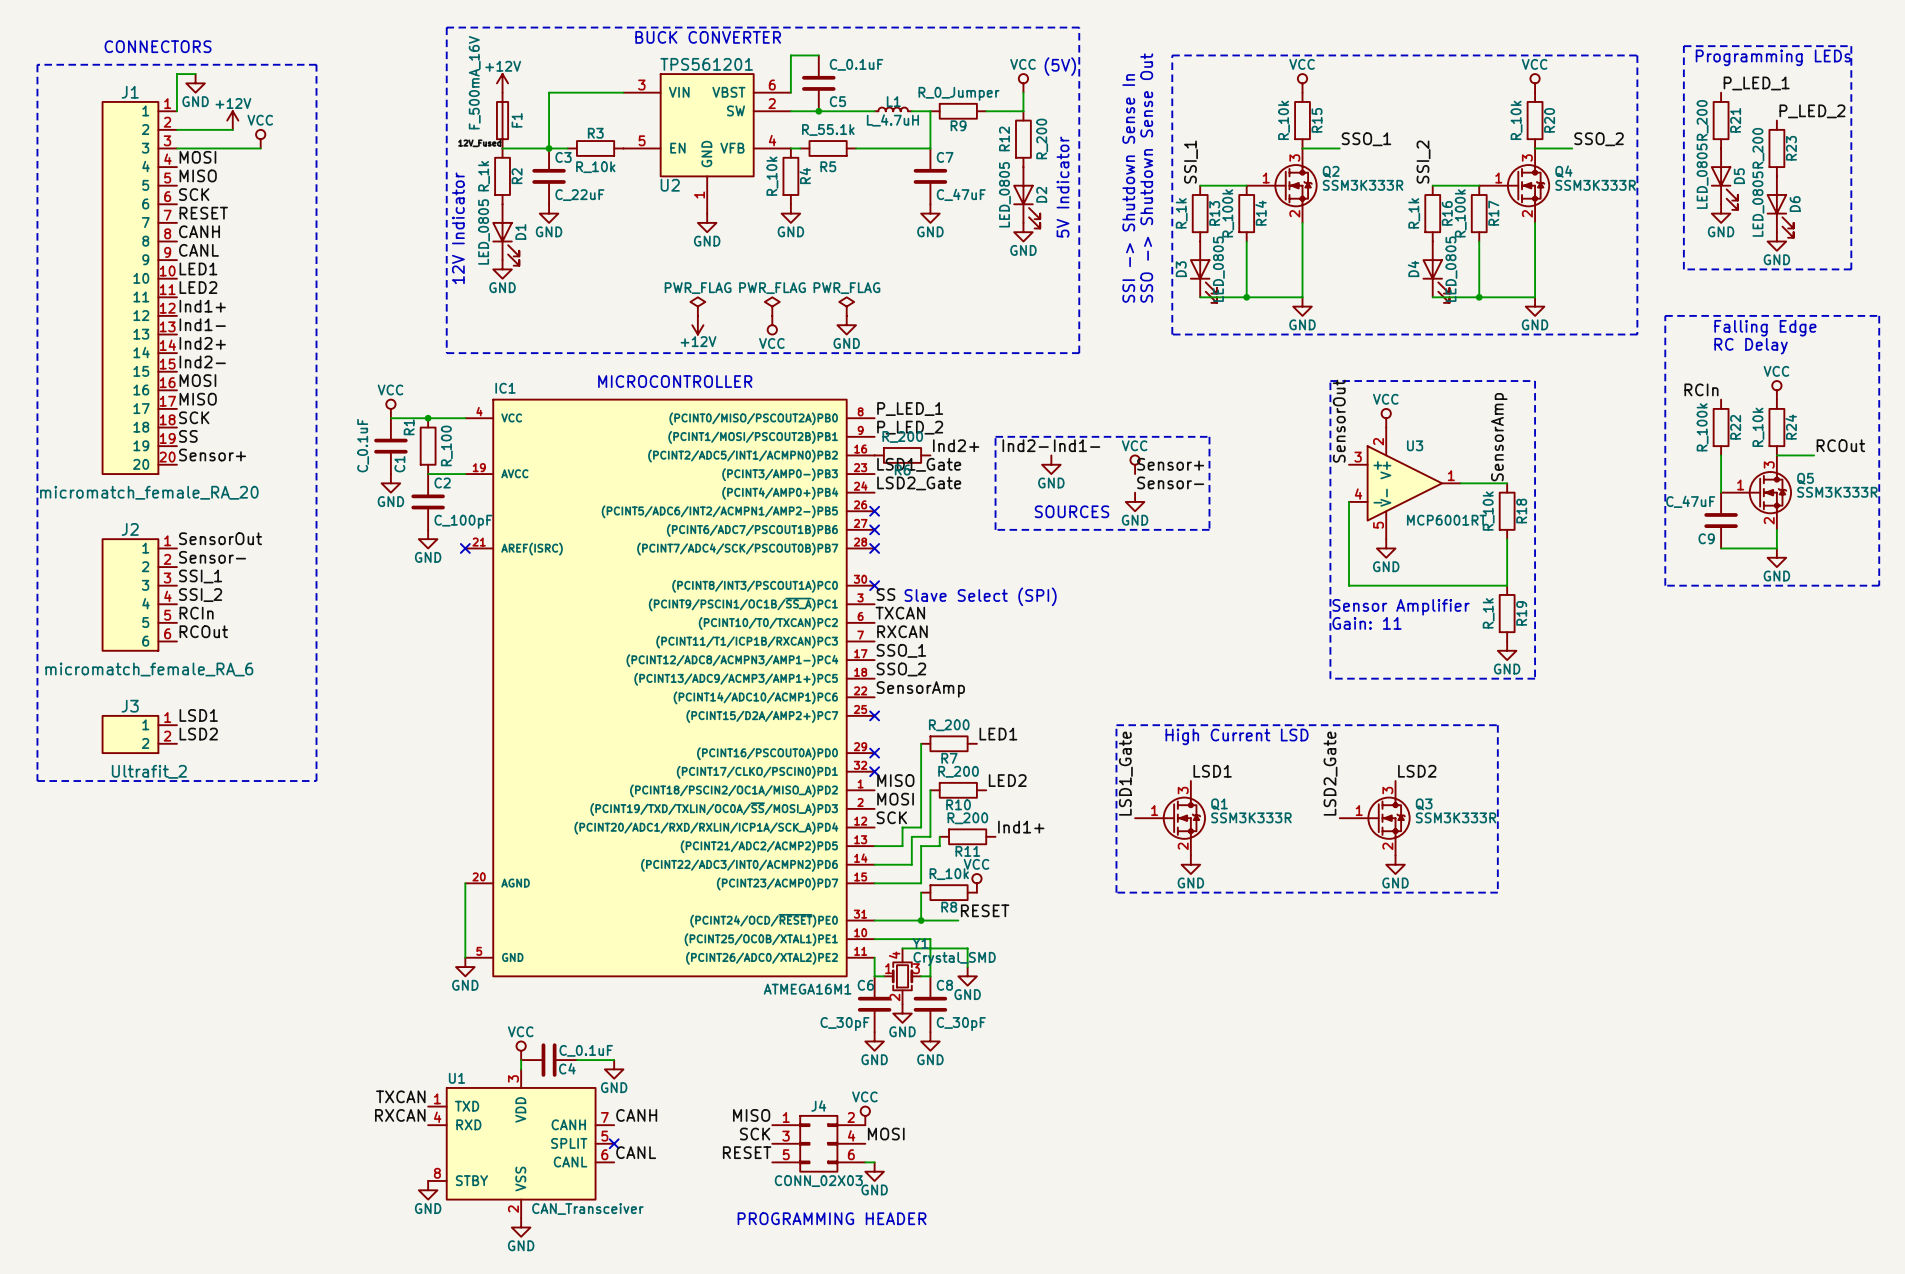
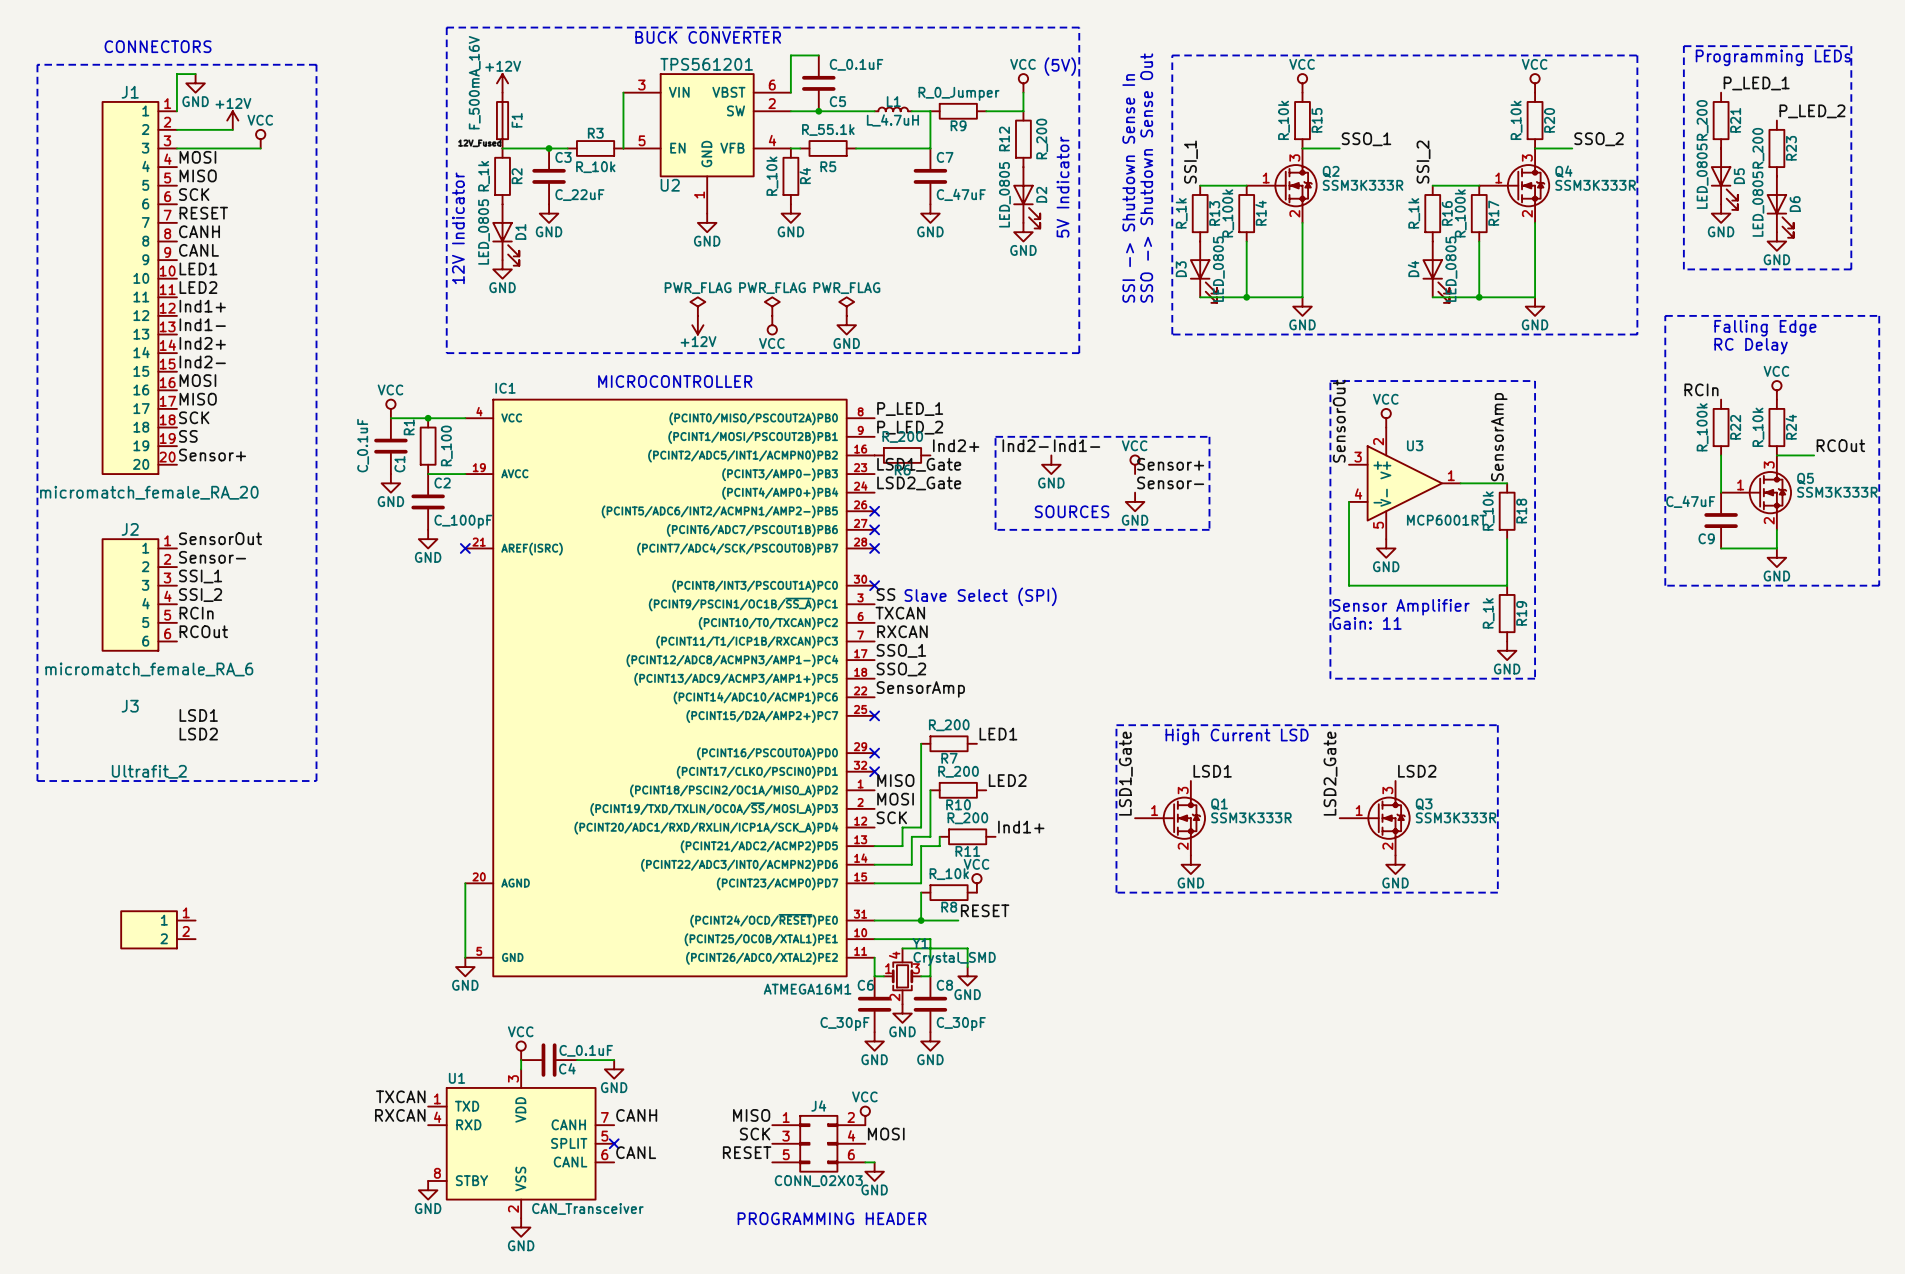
wire: (623, 92) (549, 92) (549, 148) -> (623, 92) (623, 148)
J3 position: (139, 734) -> (158, 929)

